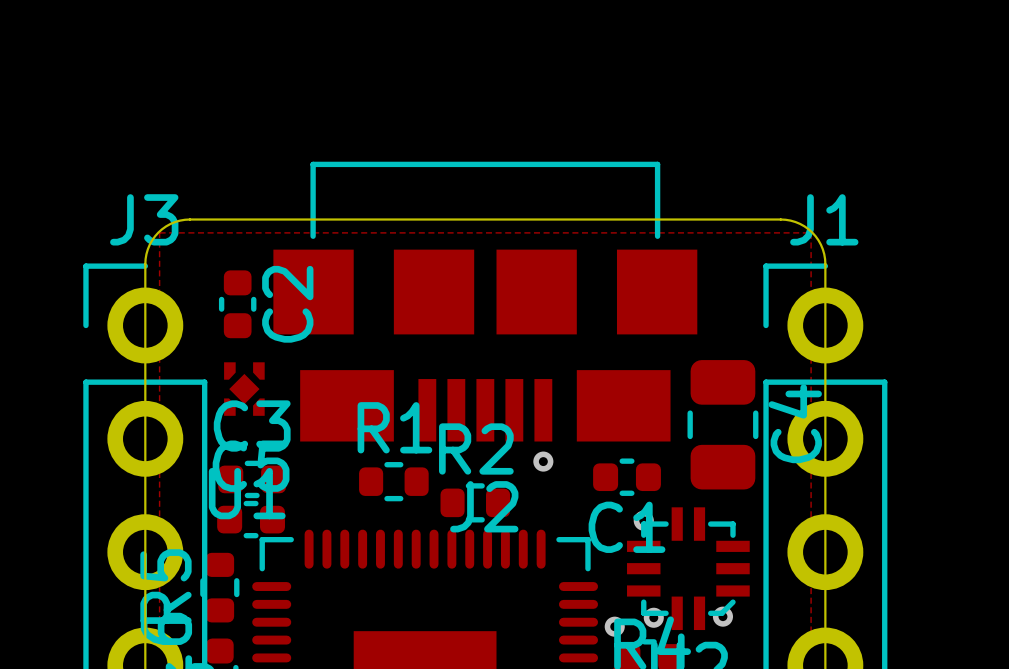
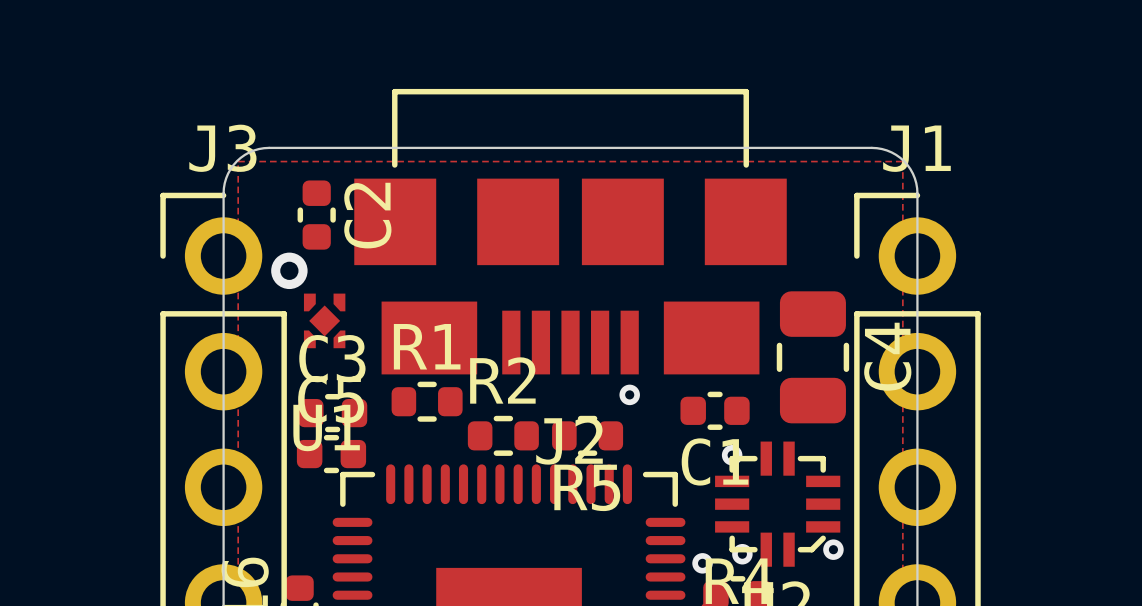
C2 position: (237, 304) -> (316, 215)
via: none -> (289, 270)
R1 position: (393, 481) -> (427, 401)
R2 position: (475, 502) -> (503, 435)
R5 rotation: 0° (219, 587) -> 90° clockwise (587, 435)
R5 position: (219, 587) -> (587, 435)
via position: (722, 616) -> (833, 549)

